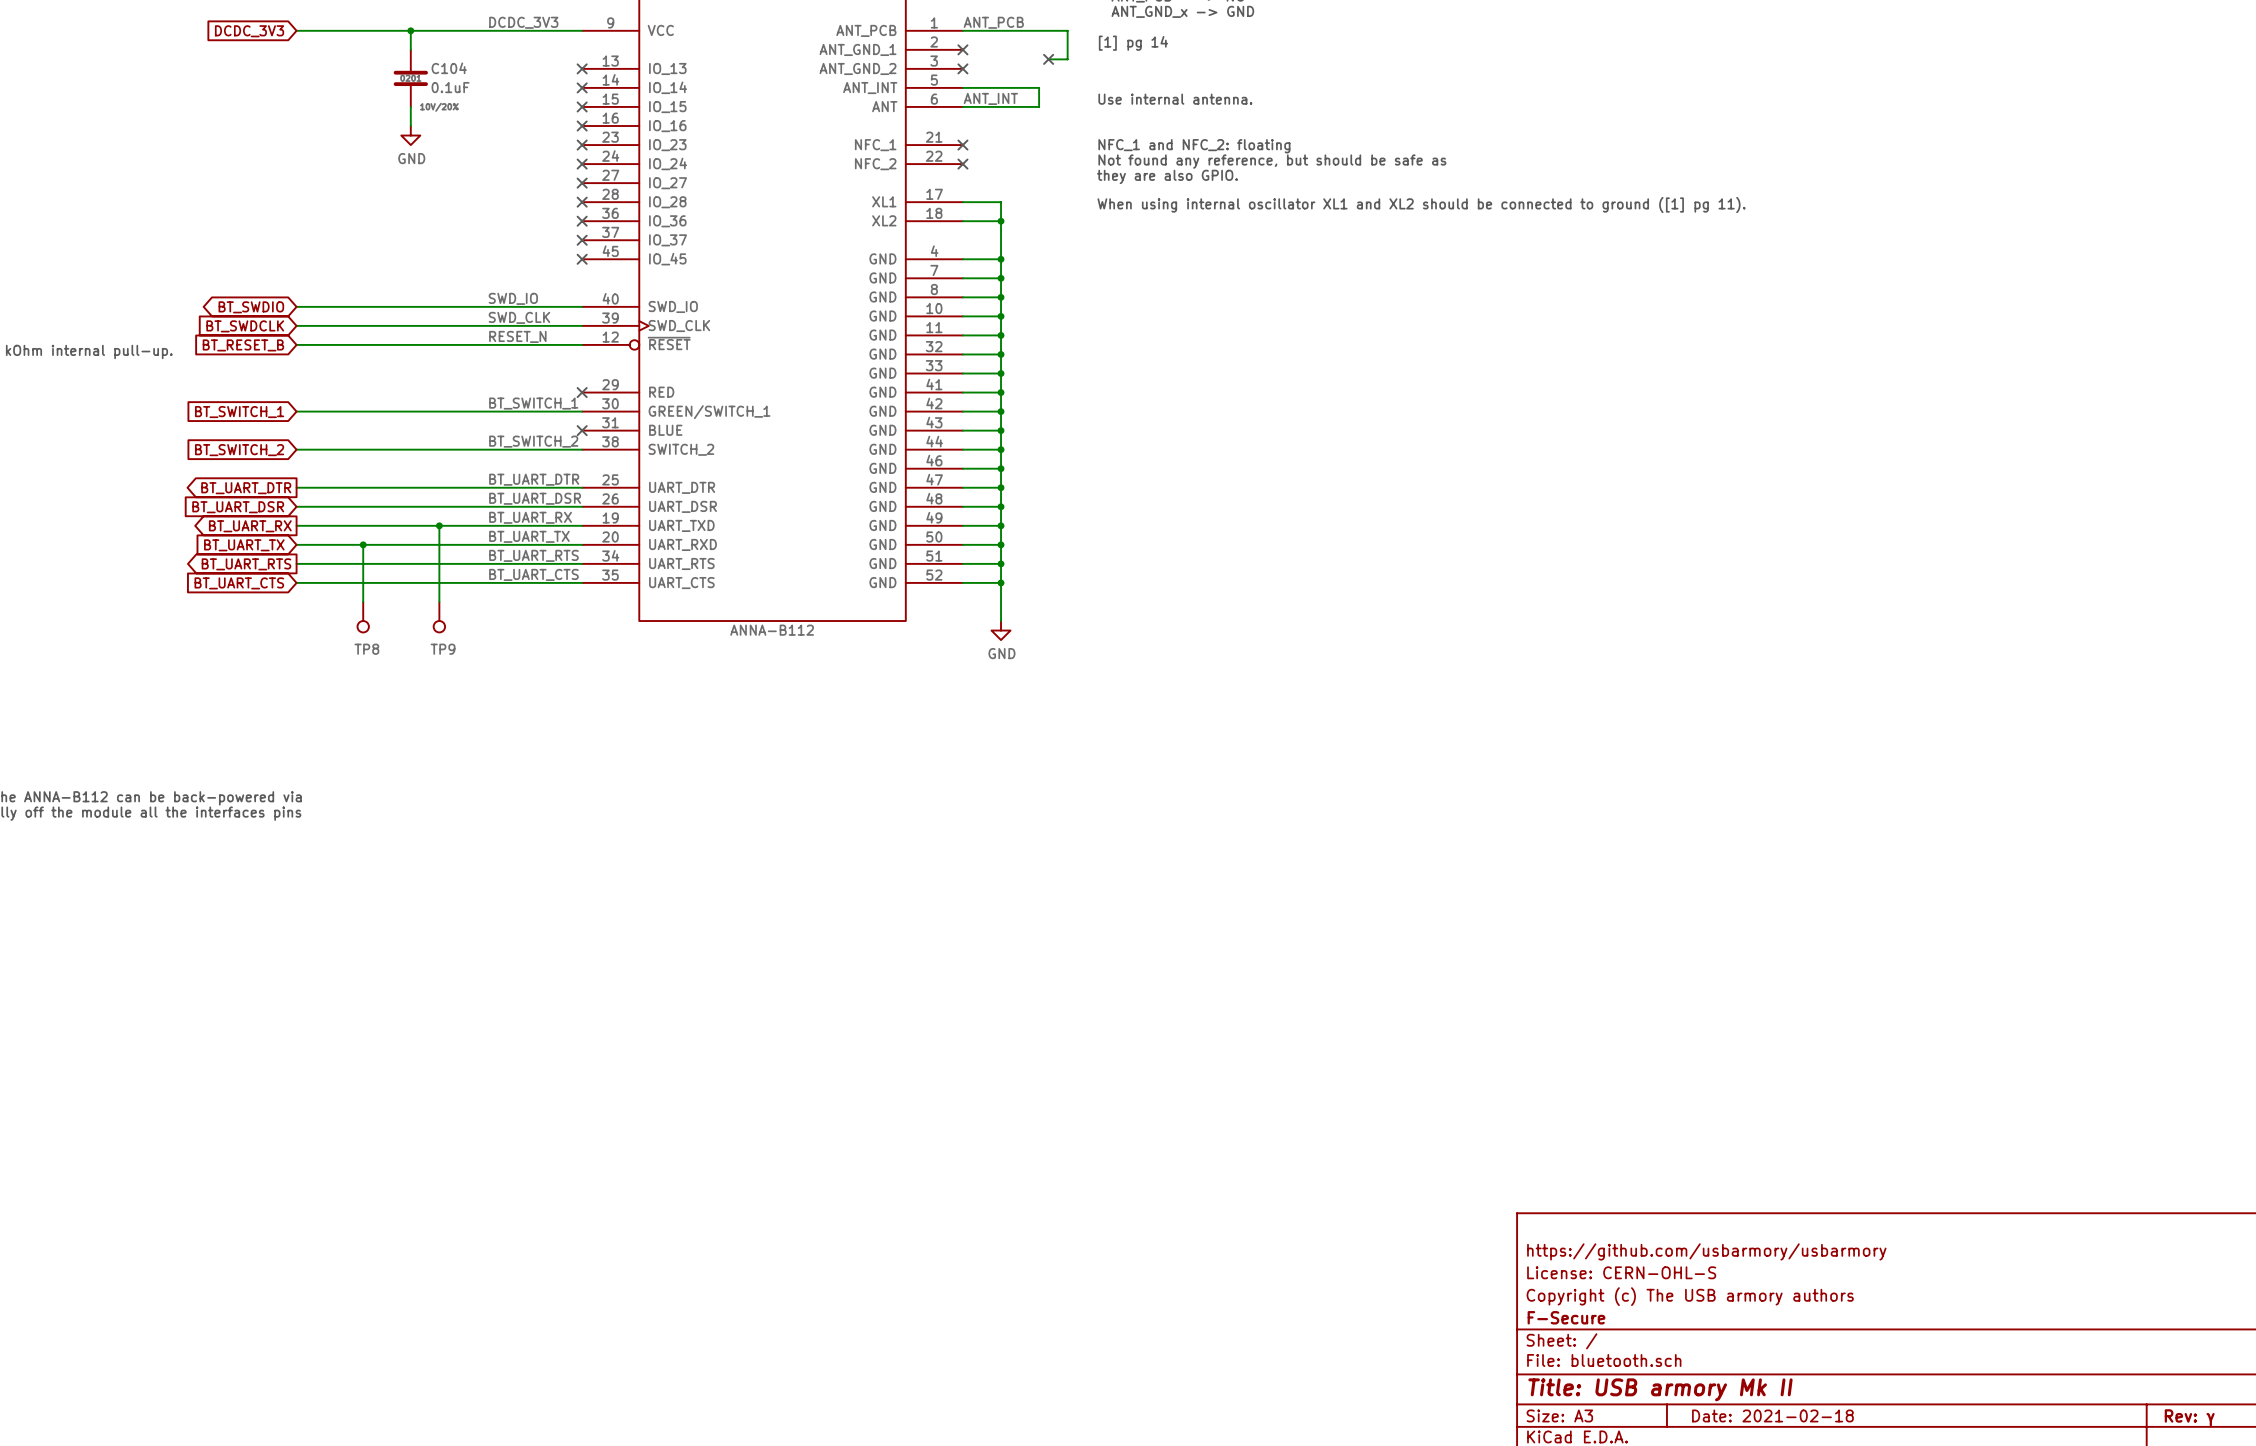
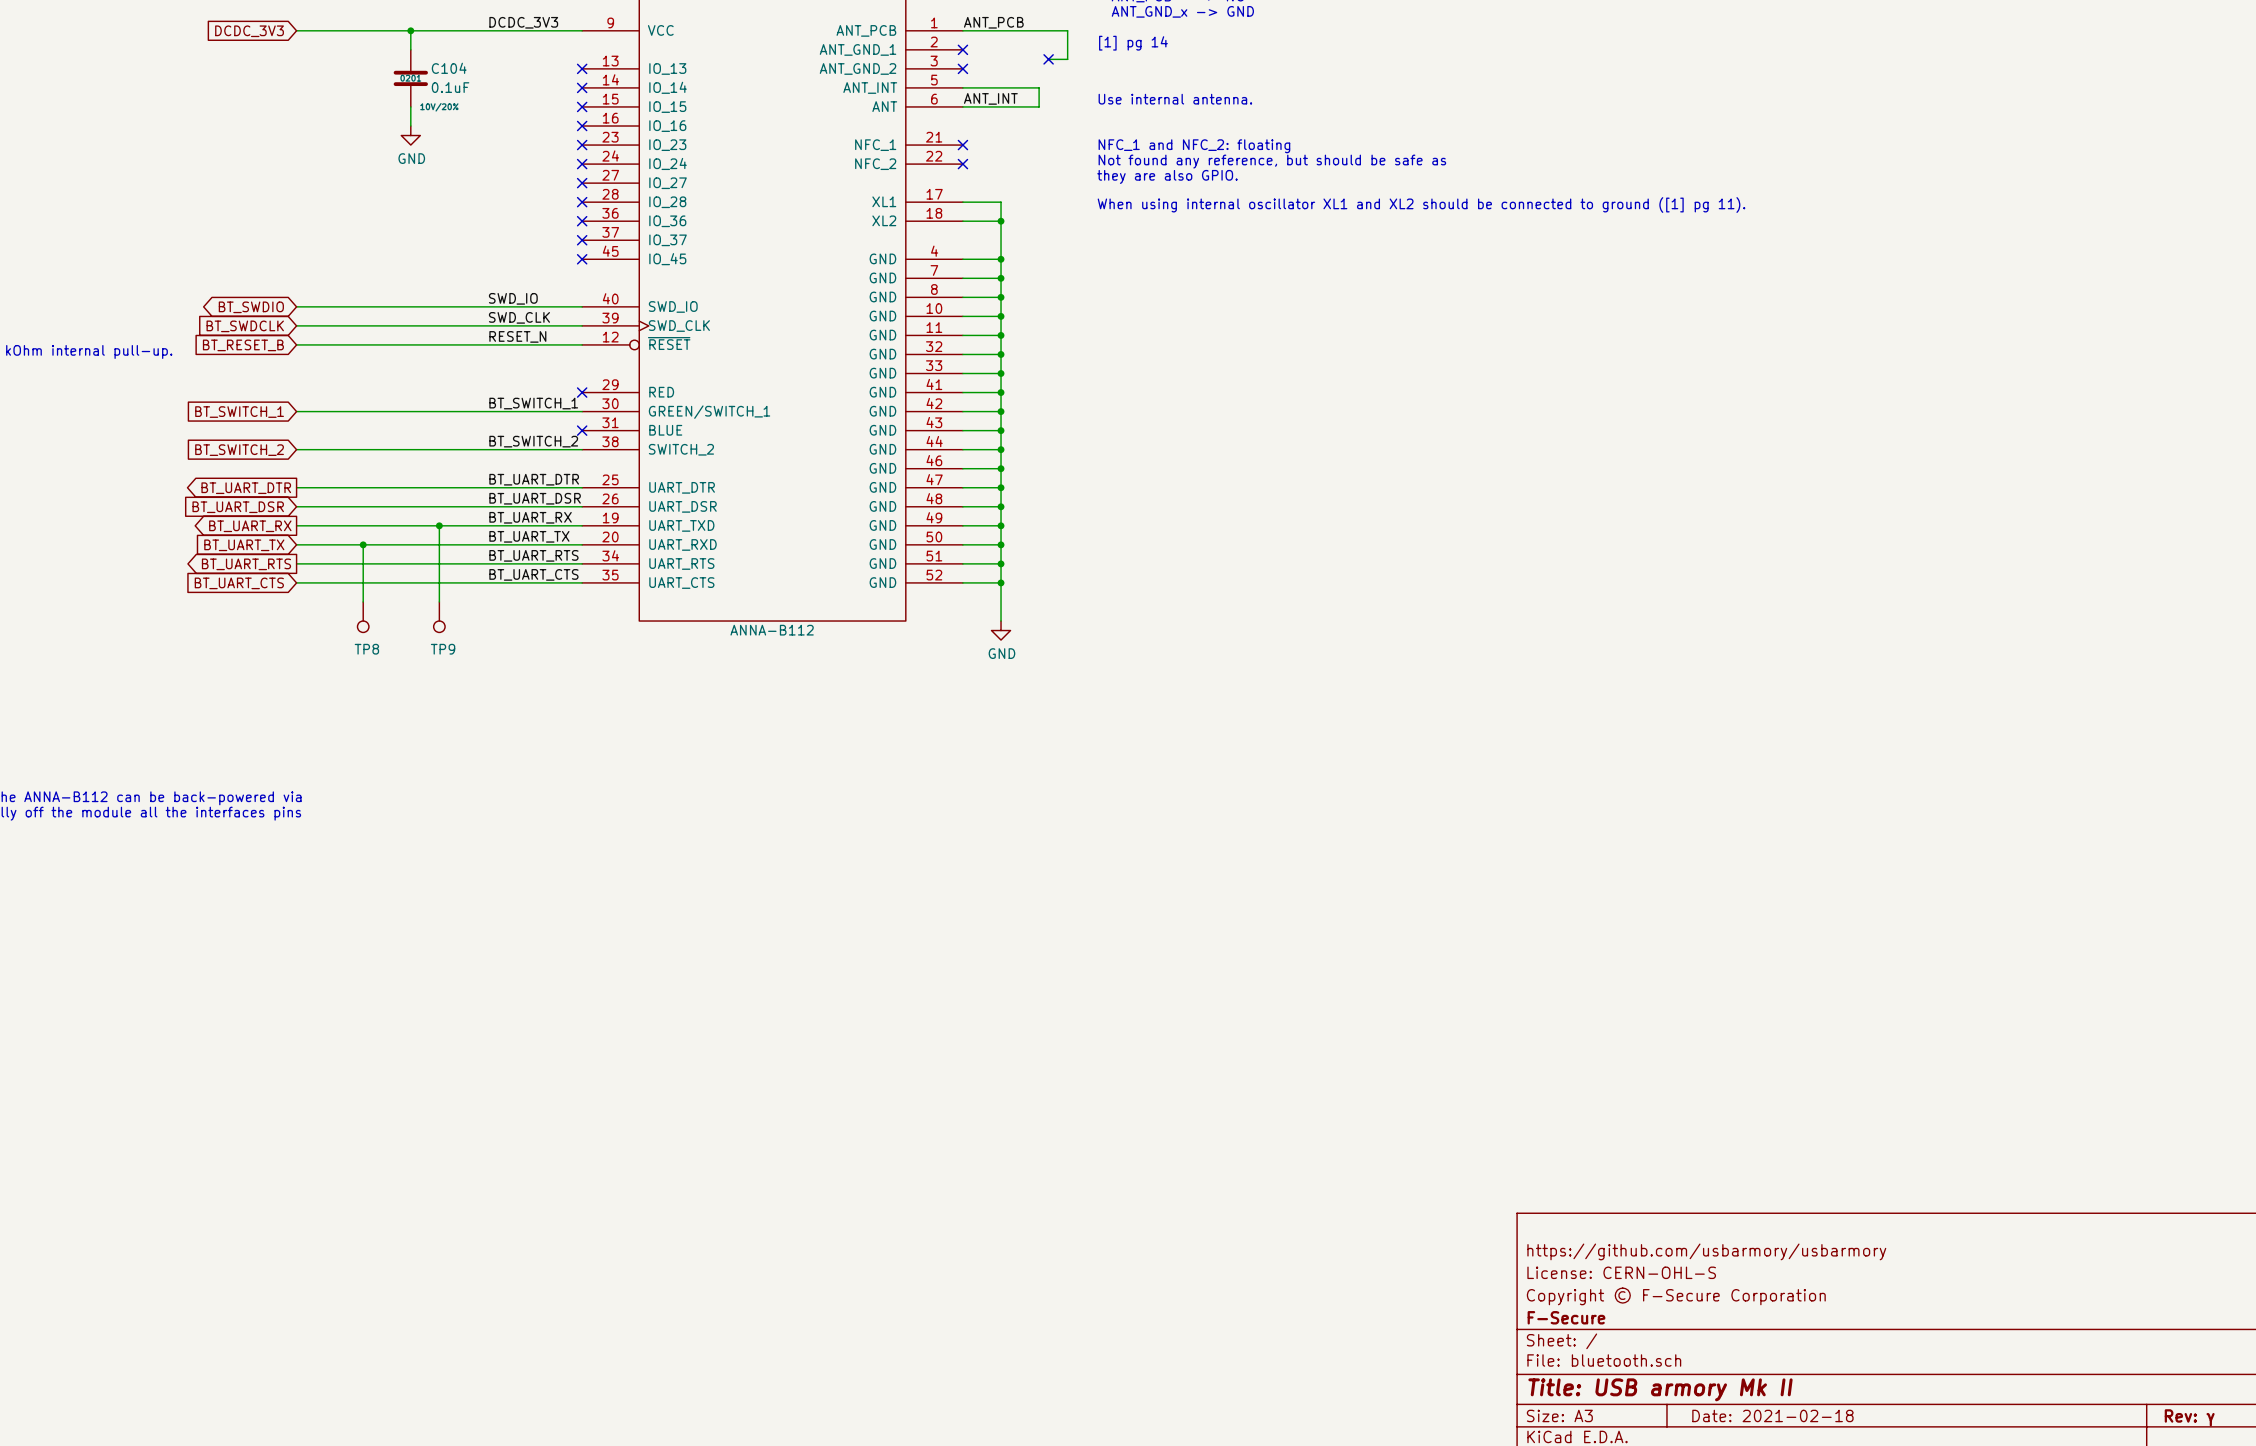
title block: Copyright (c) The USB armory authors (1690, 1296) -> Copyright © F-Secure Corporation (1676, 1296)

